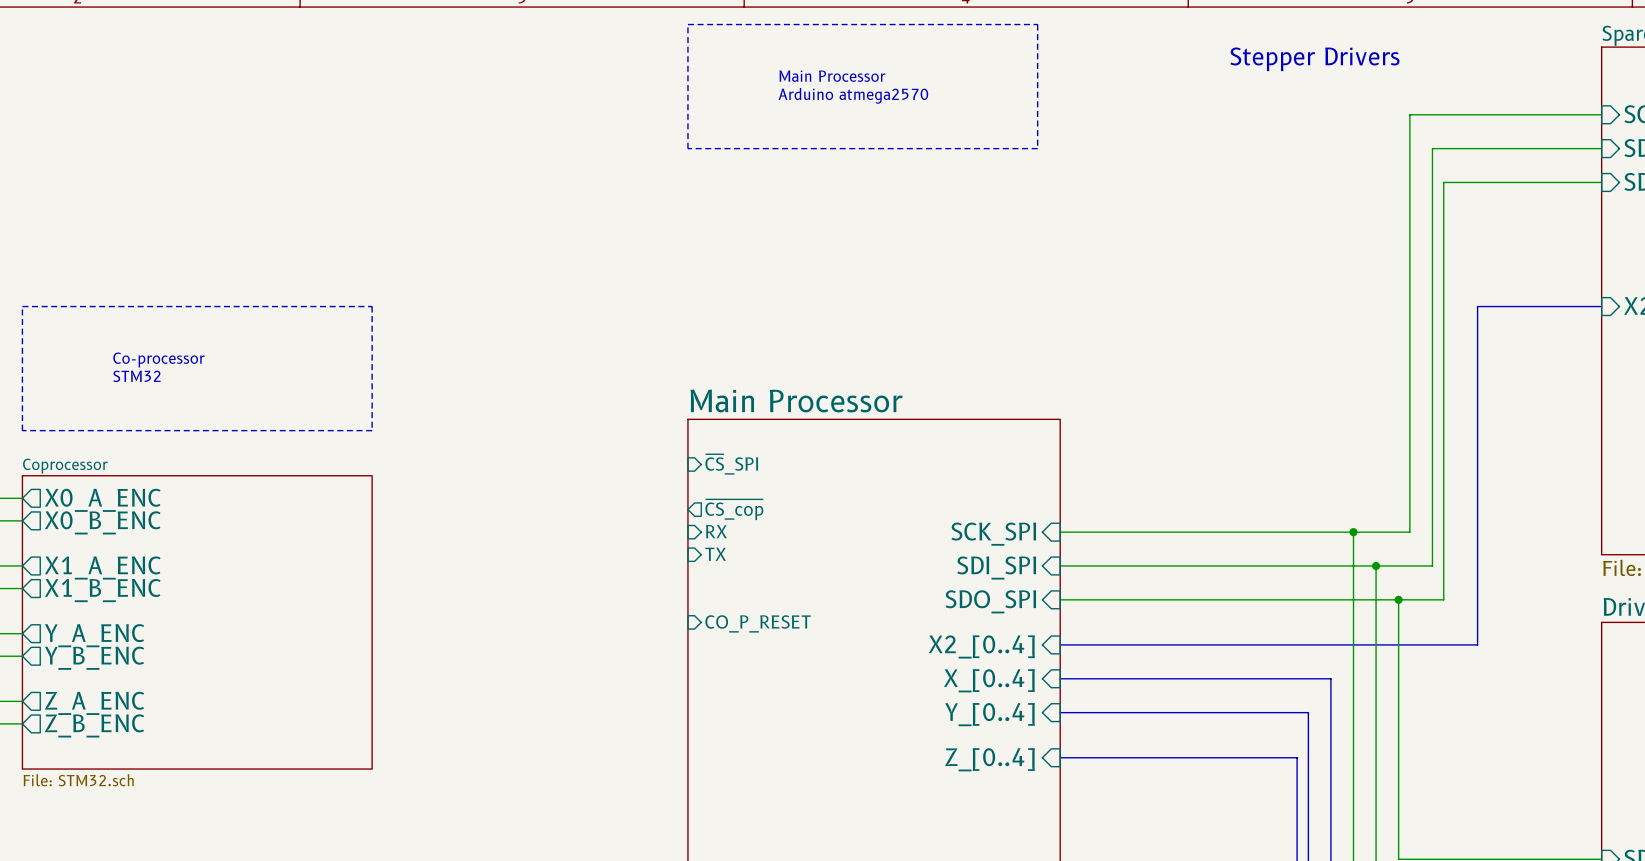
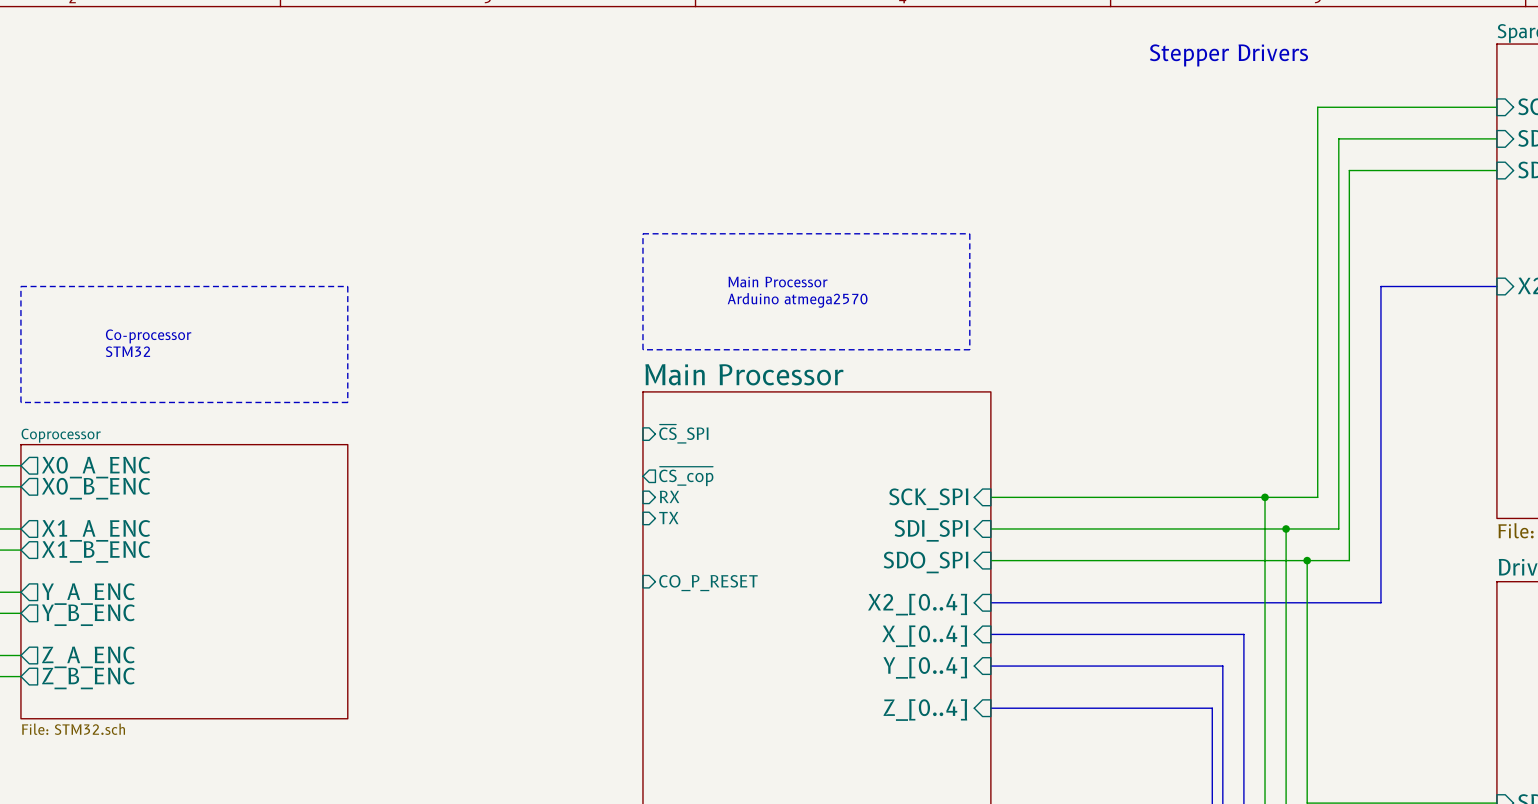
line: (687, 24) (687, 148) (1037, 148) (1037, 24) (687, 24) -> none
text: Main Processor (832, 76) -> none
text: Arduino atmega2570 (853, 95) -> none
line: none -> (642, 233) (642, 349) (969, 349) (969, 233) (642, 233)
text: none -> Main Processor (778, 282)
text: none -> Arduino atmega2570 (797, 300)

